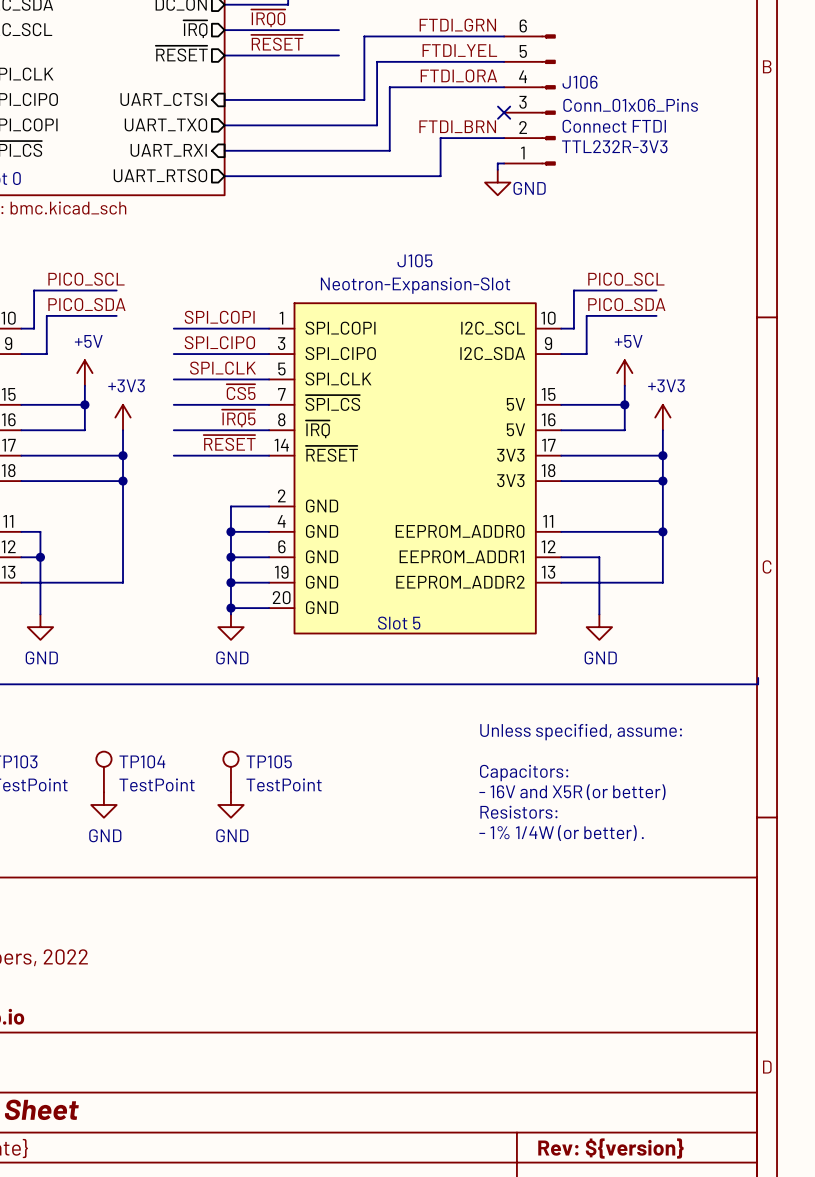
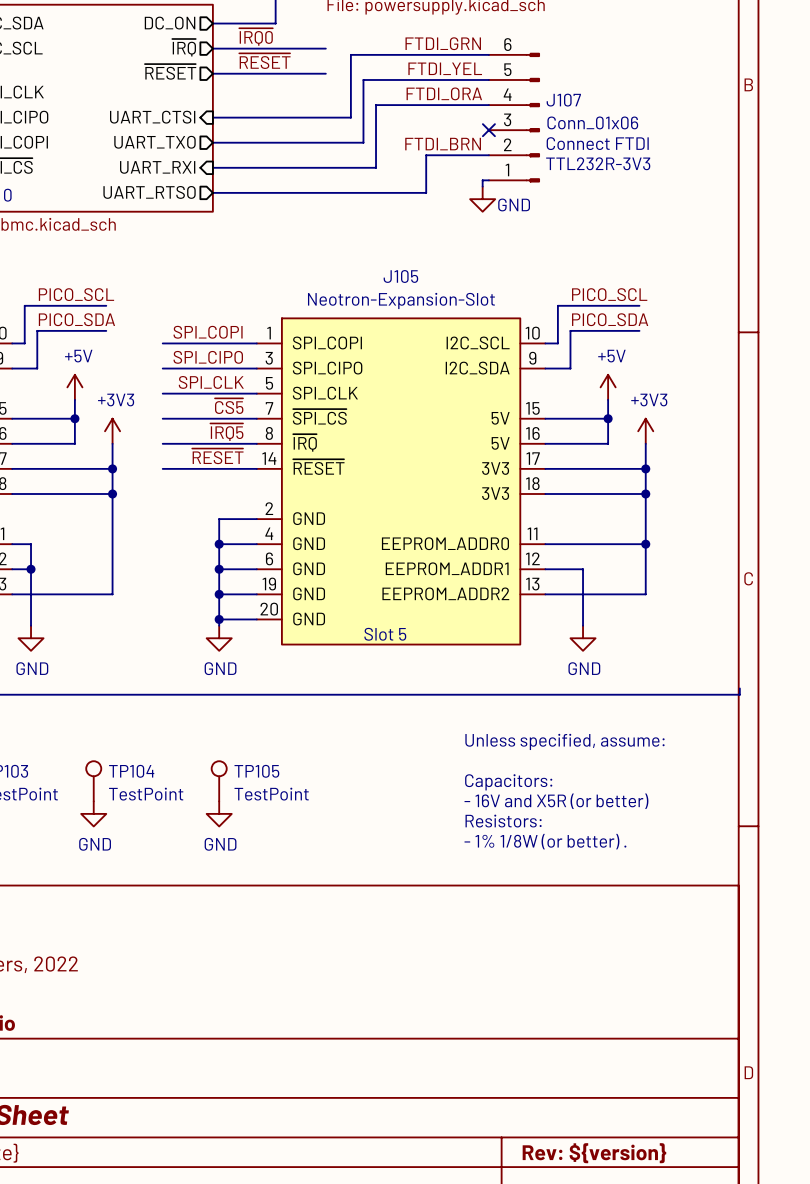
J106 name: J106 (580, 82) -> J107 (563, 100)
J106 value: Conn_01x06_Pins (630, 105) -> Conn_01x06 (592, 122)
text: - 1% 1/4W (or better) . (561, 833) -> - 1% 1/8W (or better) . (545, 841)

